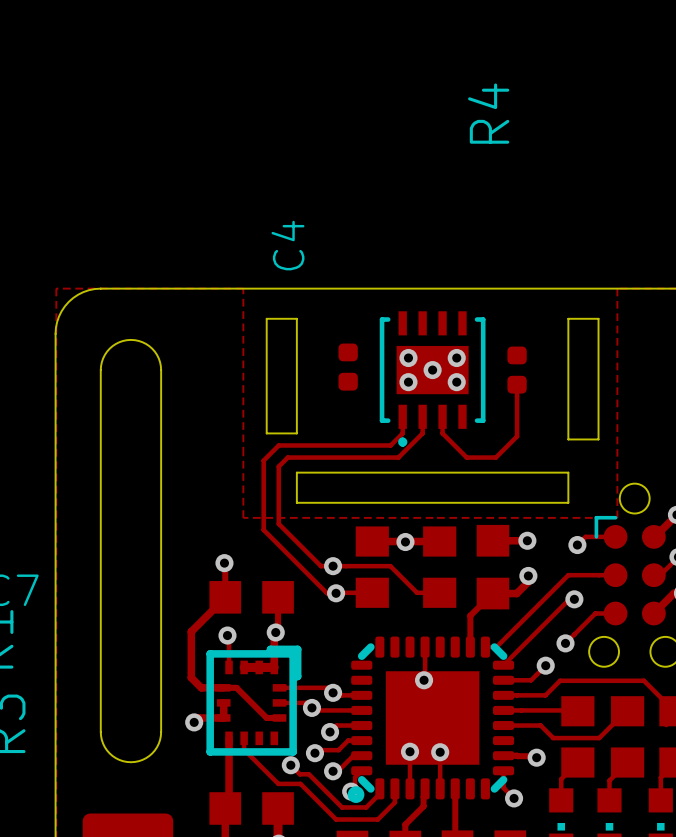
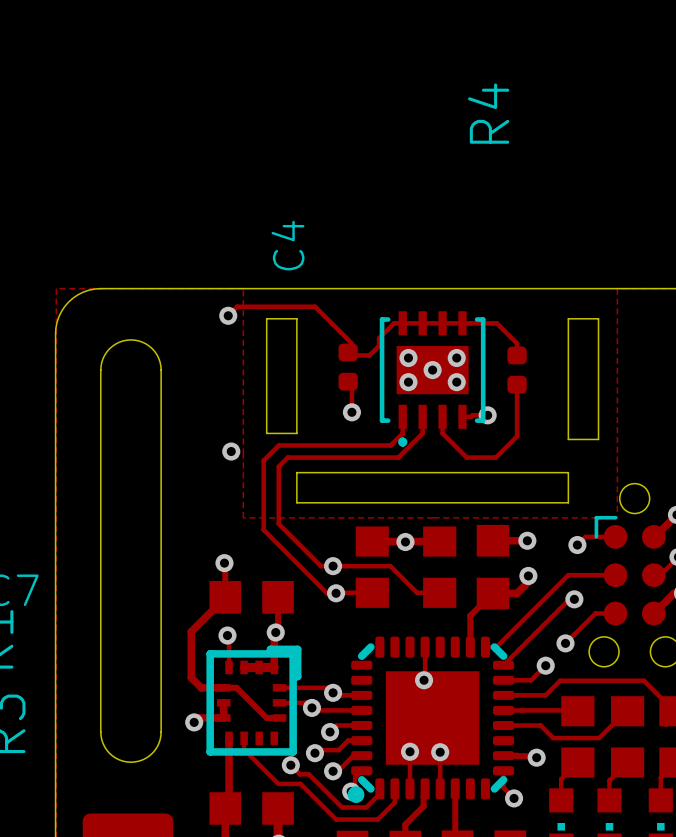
track: none -> (228, 315) (237, 306) (315, 306) (351, 343) (351, 355) (369, 355) (379, 345) (379, 338) (394, 323) (496, 323) (517, 343) (517, 355)
via: none -> (228, 315)
track: none -> (351, 384) (351, 412)
via: none -> (351, 412)
track: none -> (487, 415) (462, 416)
via: none -> (487, 415)
via: none -> (231, 451)

